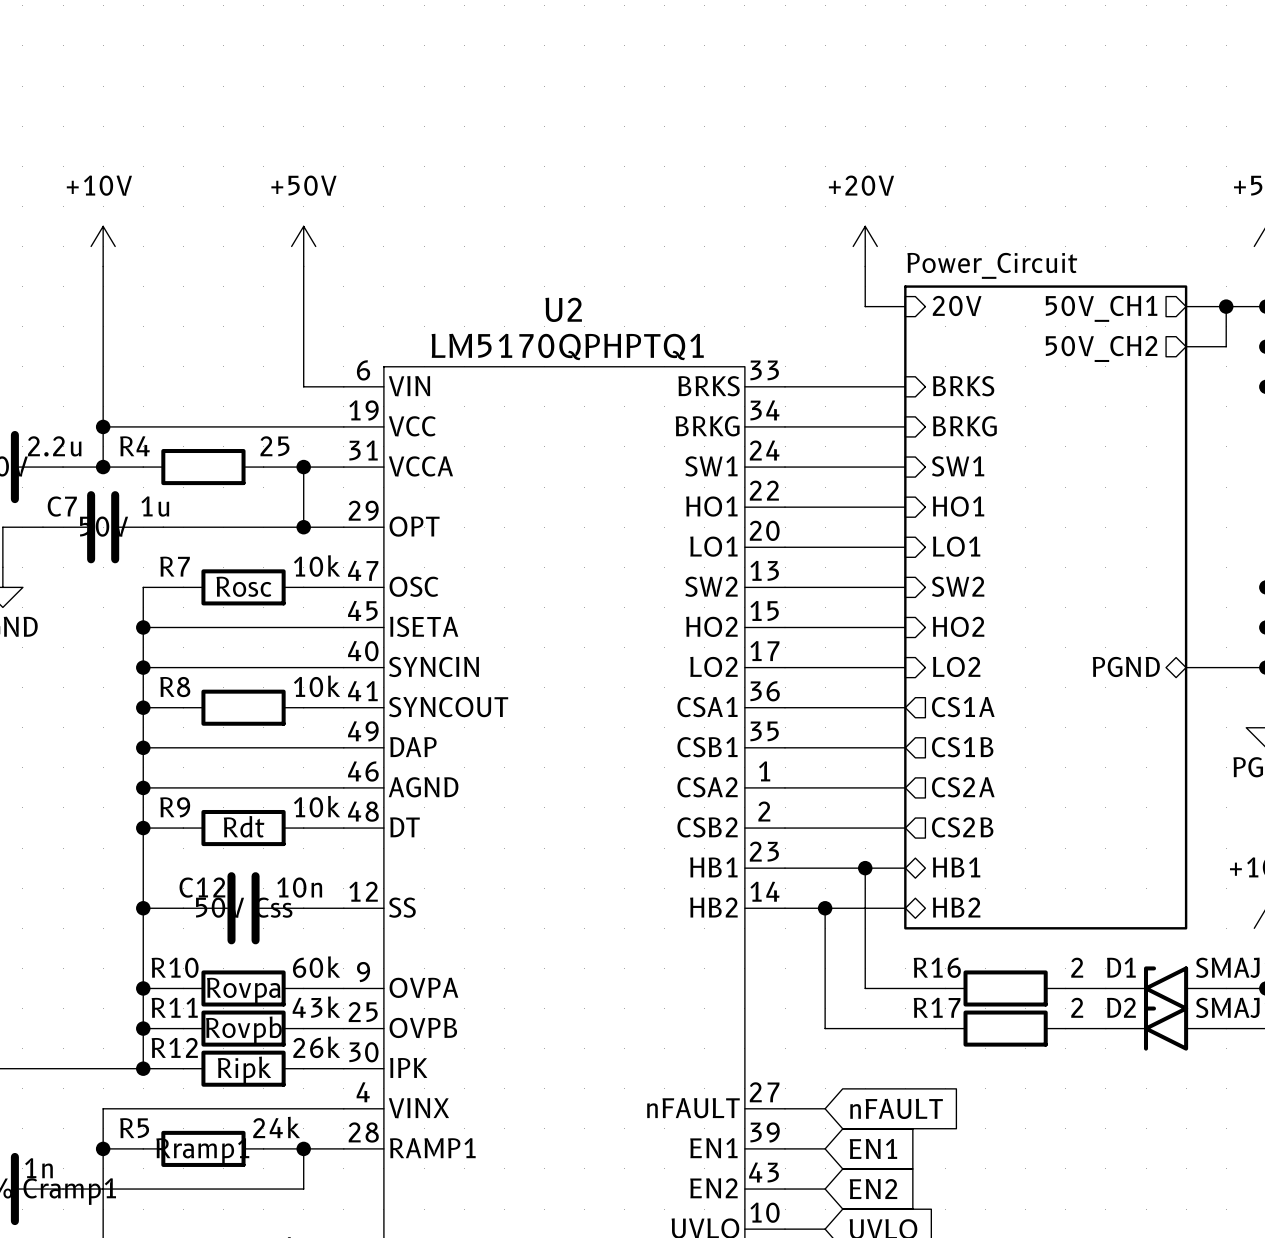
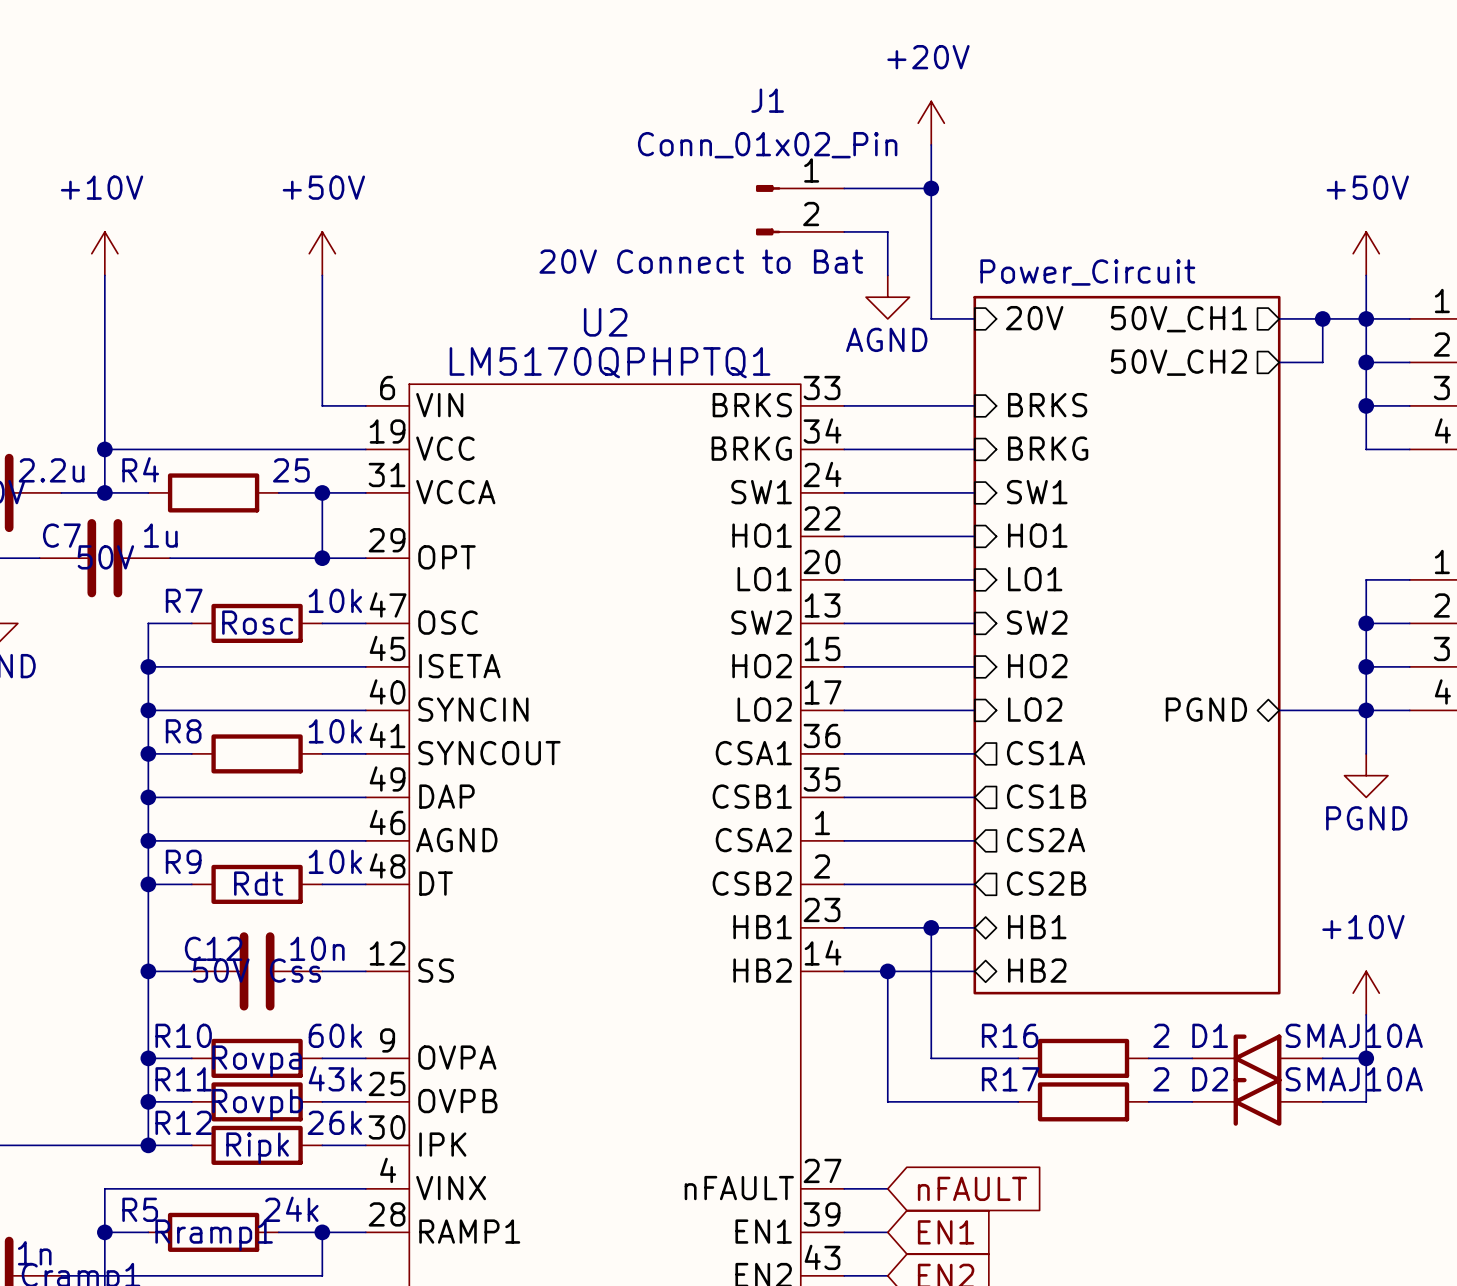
wire: none -> (931, 144) (931, 275)
wire: none -> (844, 188) (931, 188)
junction: none -> (931, 188)
J1: none -> Conn_01x02_Pin (800, 210)
wire: none -> (844, 231) (887, 231) (887, 275)
power symbol position: +20V (865, 246) -> +20V (931, 123)
power symbol: none -> AGND (887, 297)

